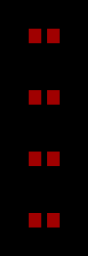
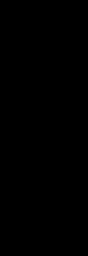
part: (44, 35) -> none
part: (44, 97) -> none
part: (44, 158) -> none
part: (44, 220) -> none

